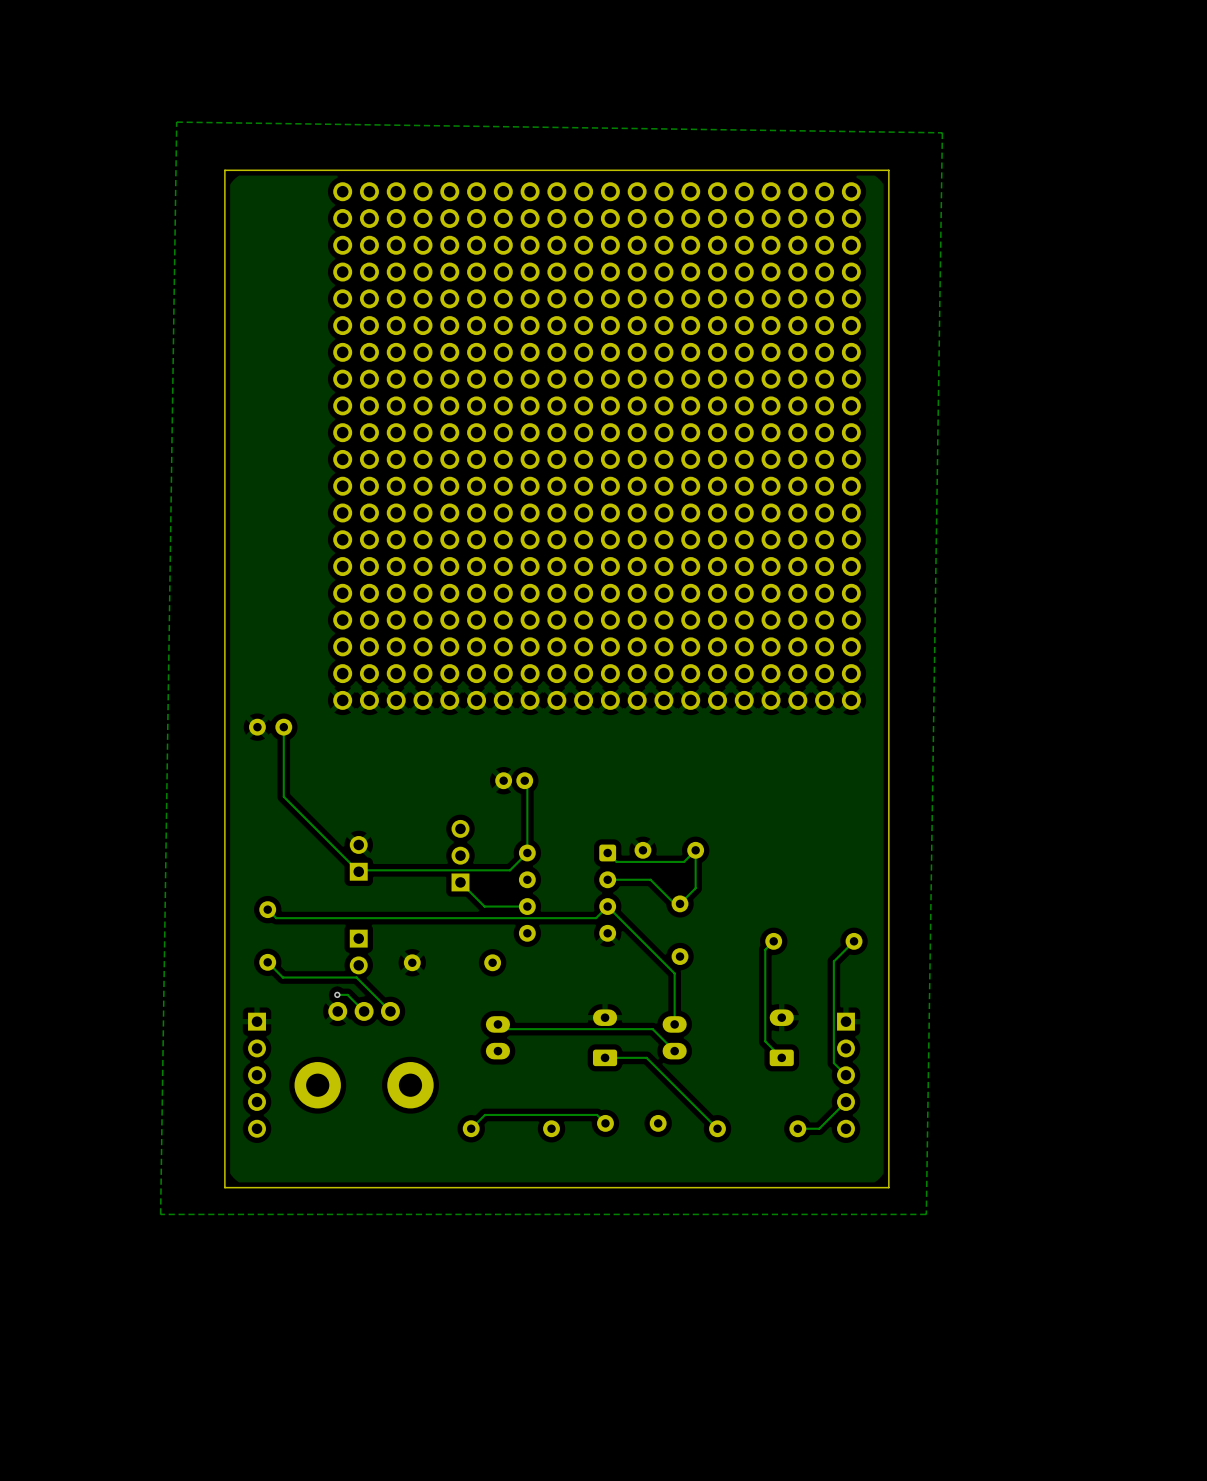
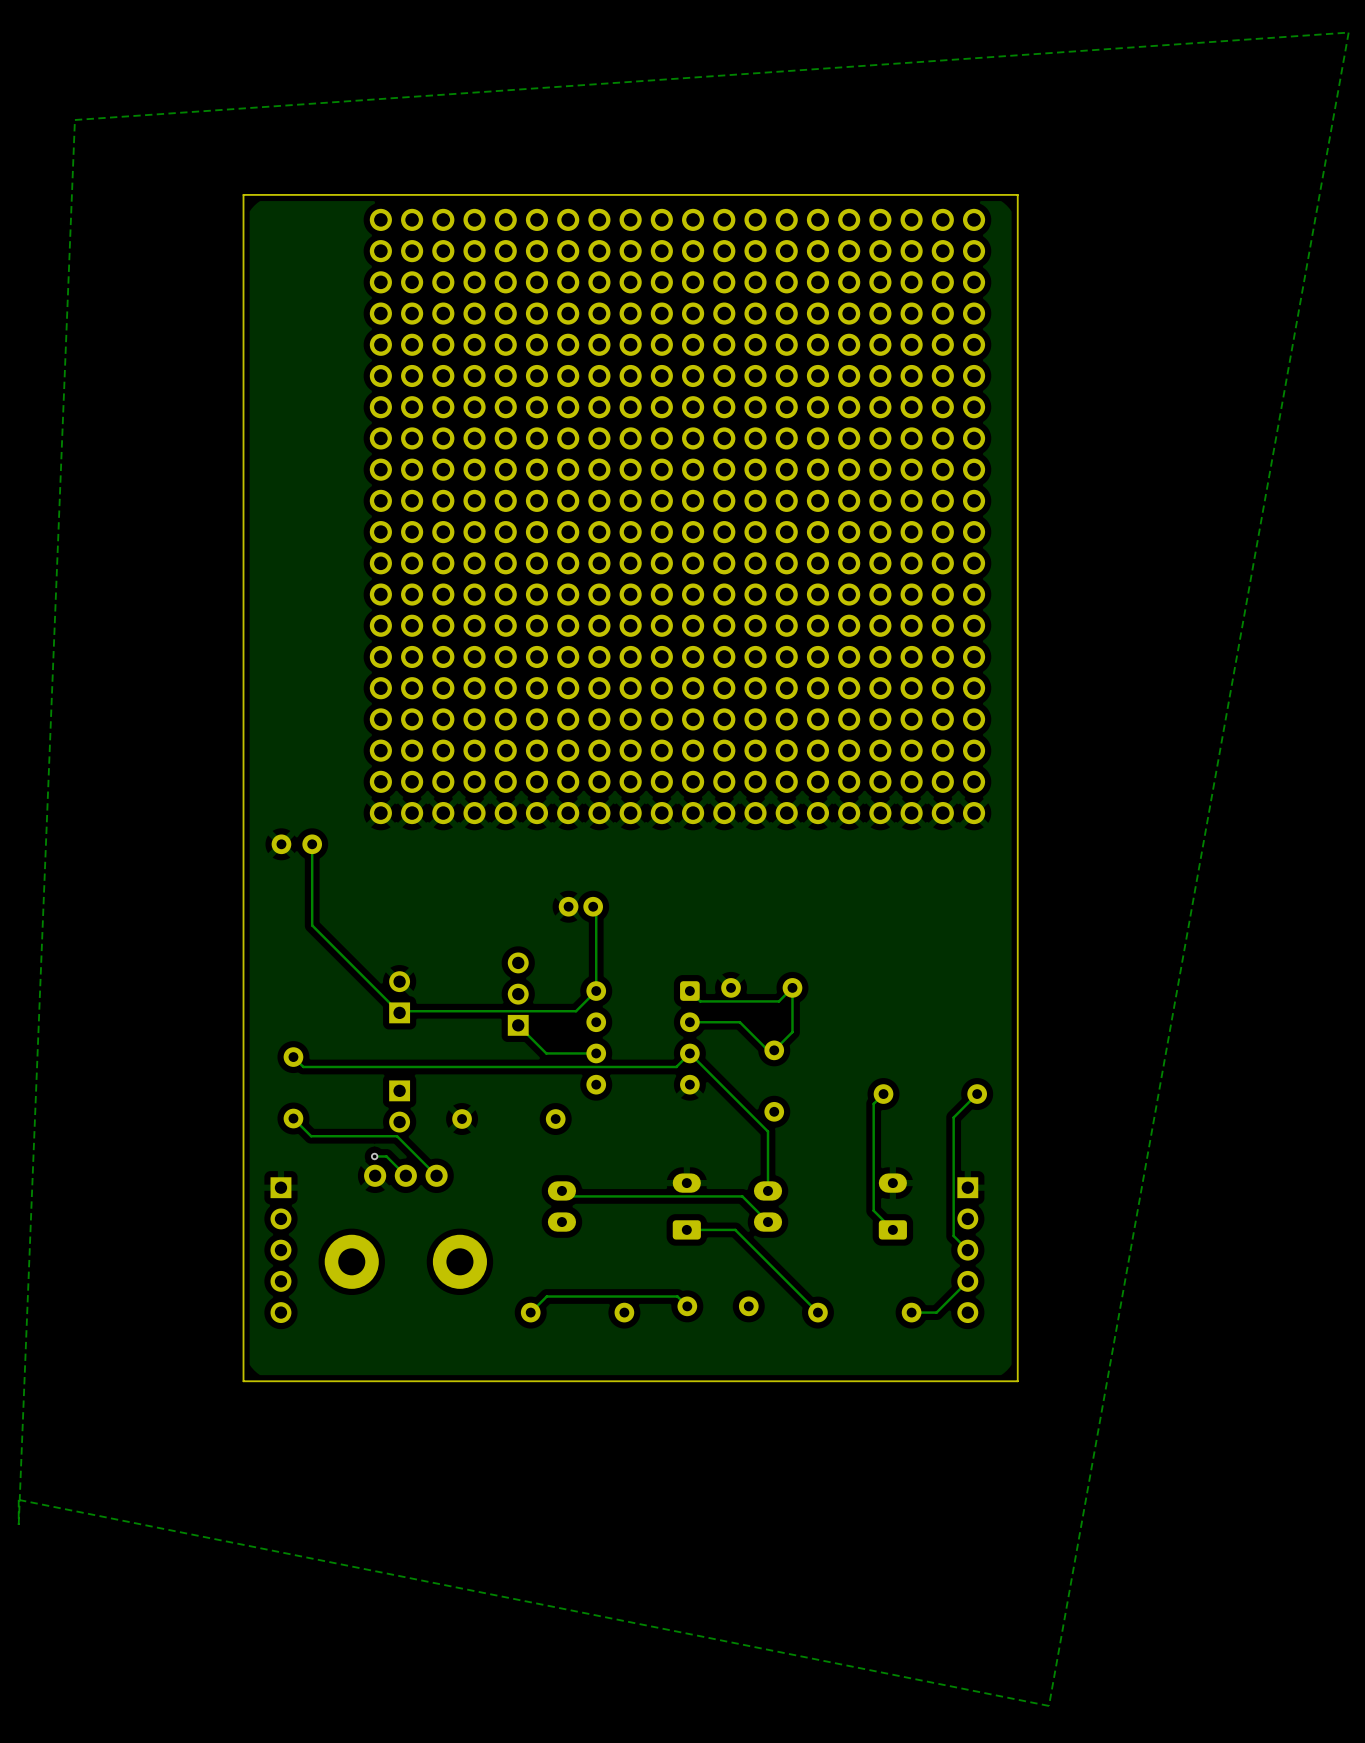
zone outline: (176, 122) (160, 1214) (926, 1214) (942, 132) (176, 122) -> (1348, 32) (1048, 1705) (18, 1499) (18, 1524) (74, 120) (1348, 32)

